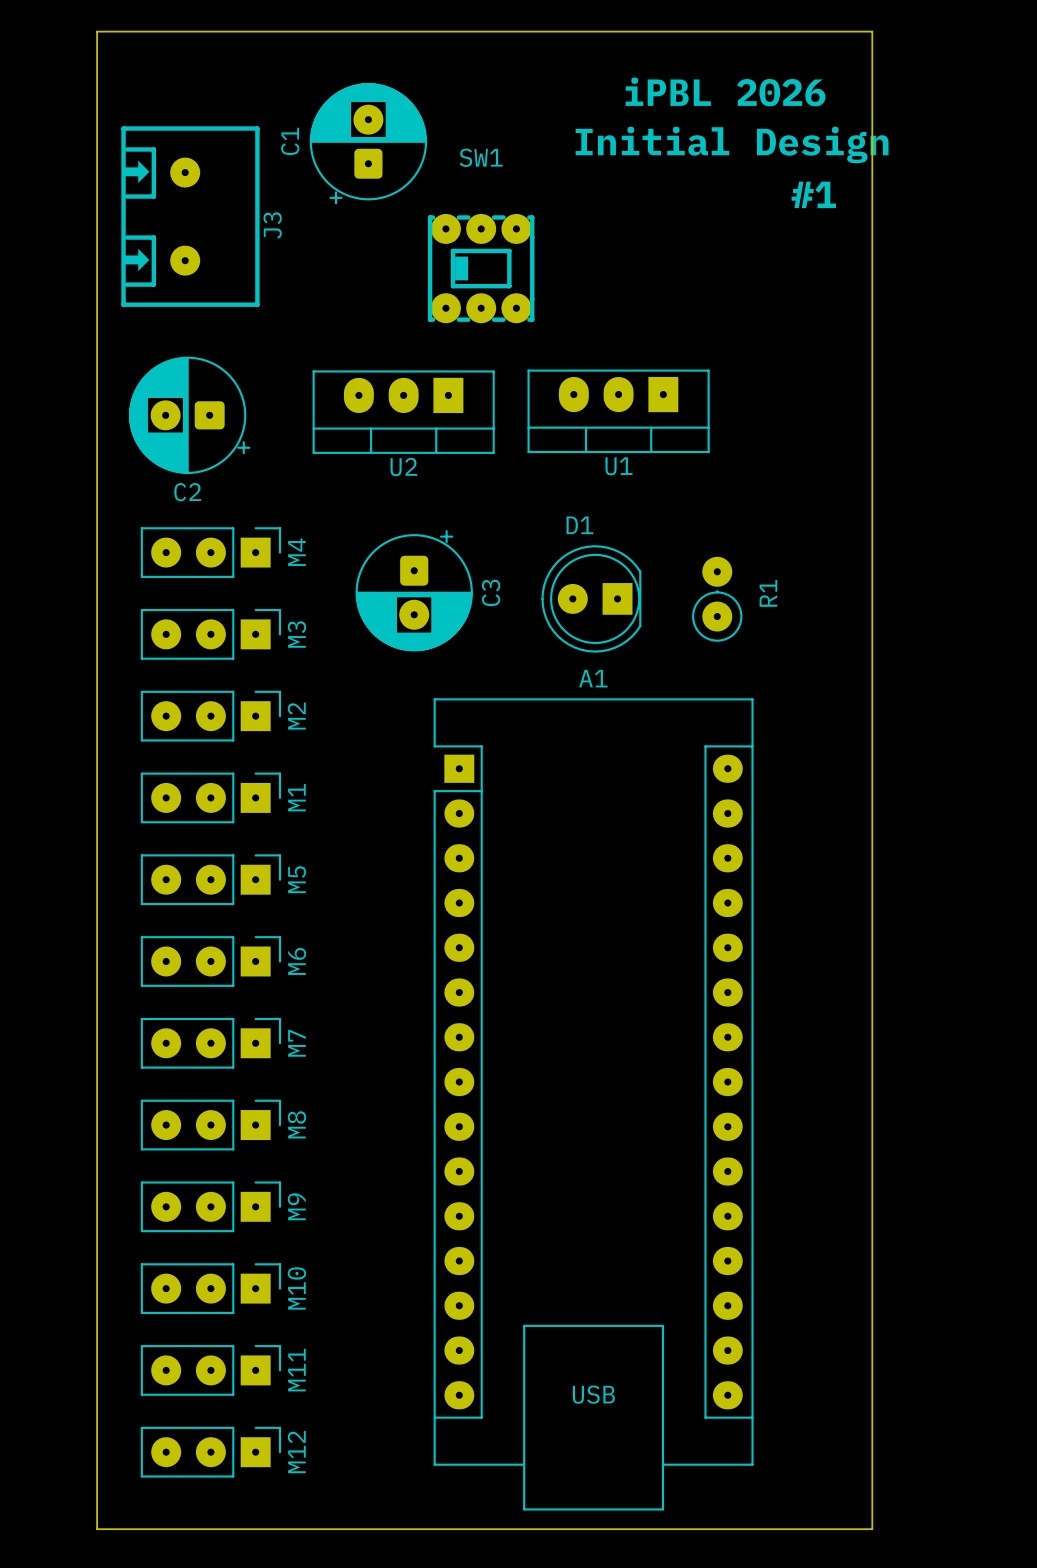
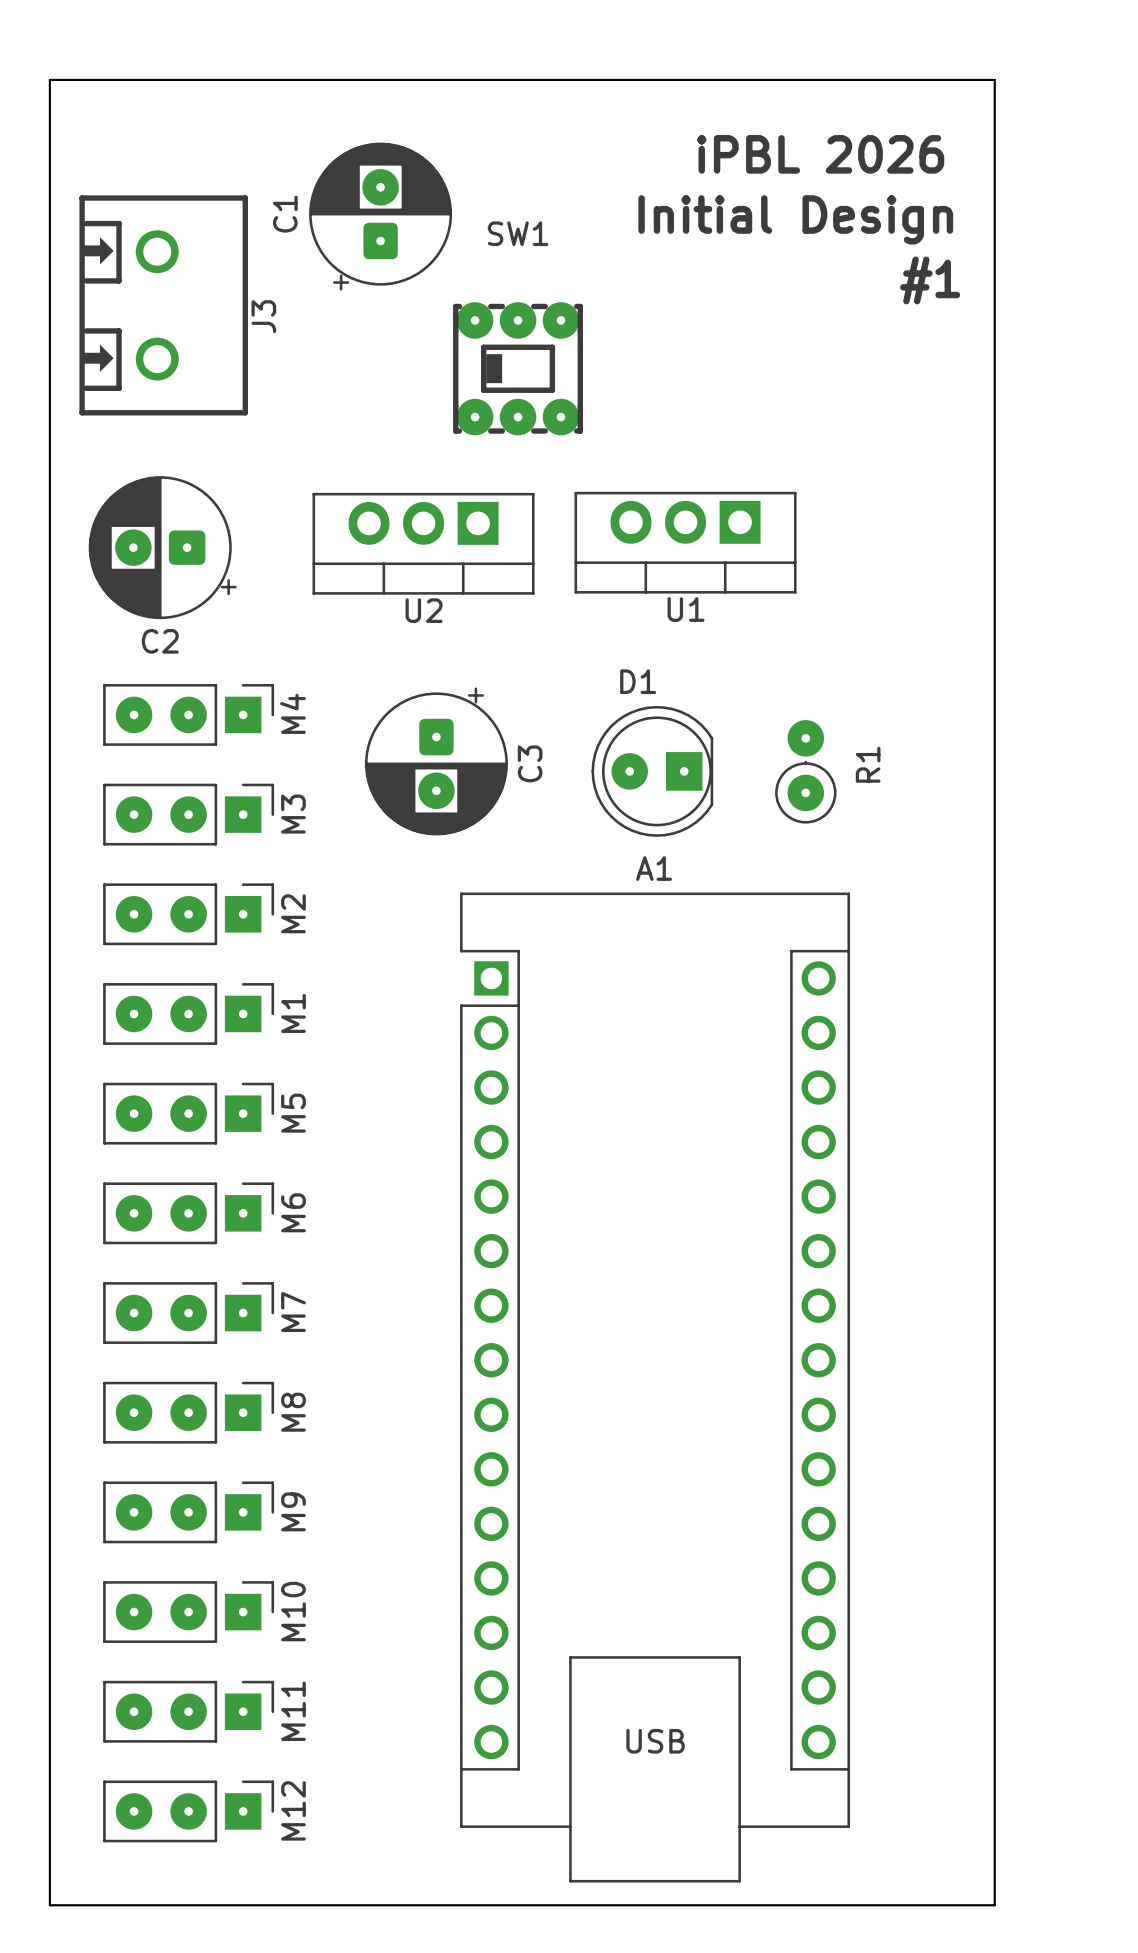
J3 footprint: [121, 126, 260, 307] -> [79, 195, 248, 416]
U1 footprint: [527, 369, 710, 454] -> [574, 491, 797, 594]
U2 footprint: [312, 370, 495, 454] -> [312, 492, 535, 595]
A1 footprint: [433, 698, 754, 1511] -> [460, 892, 851, 1883]

